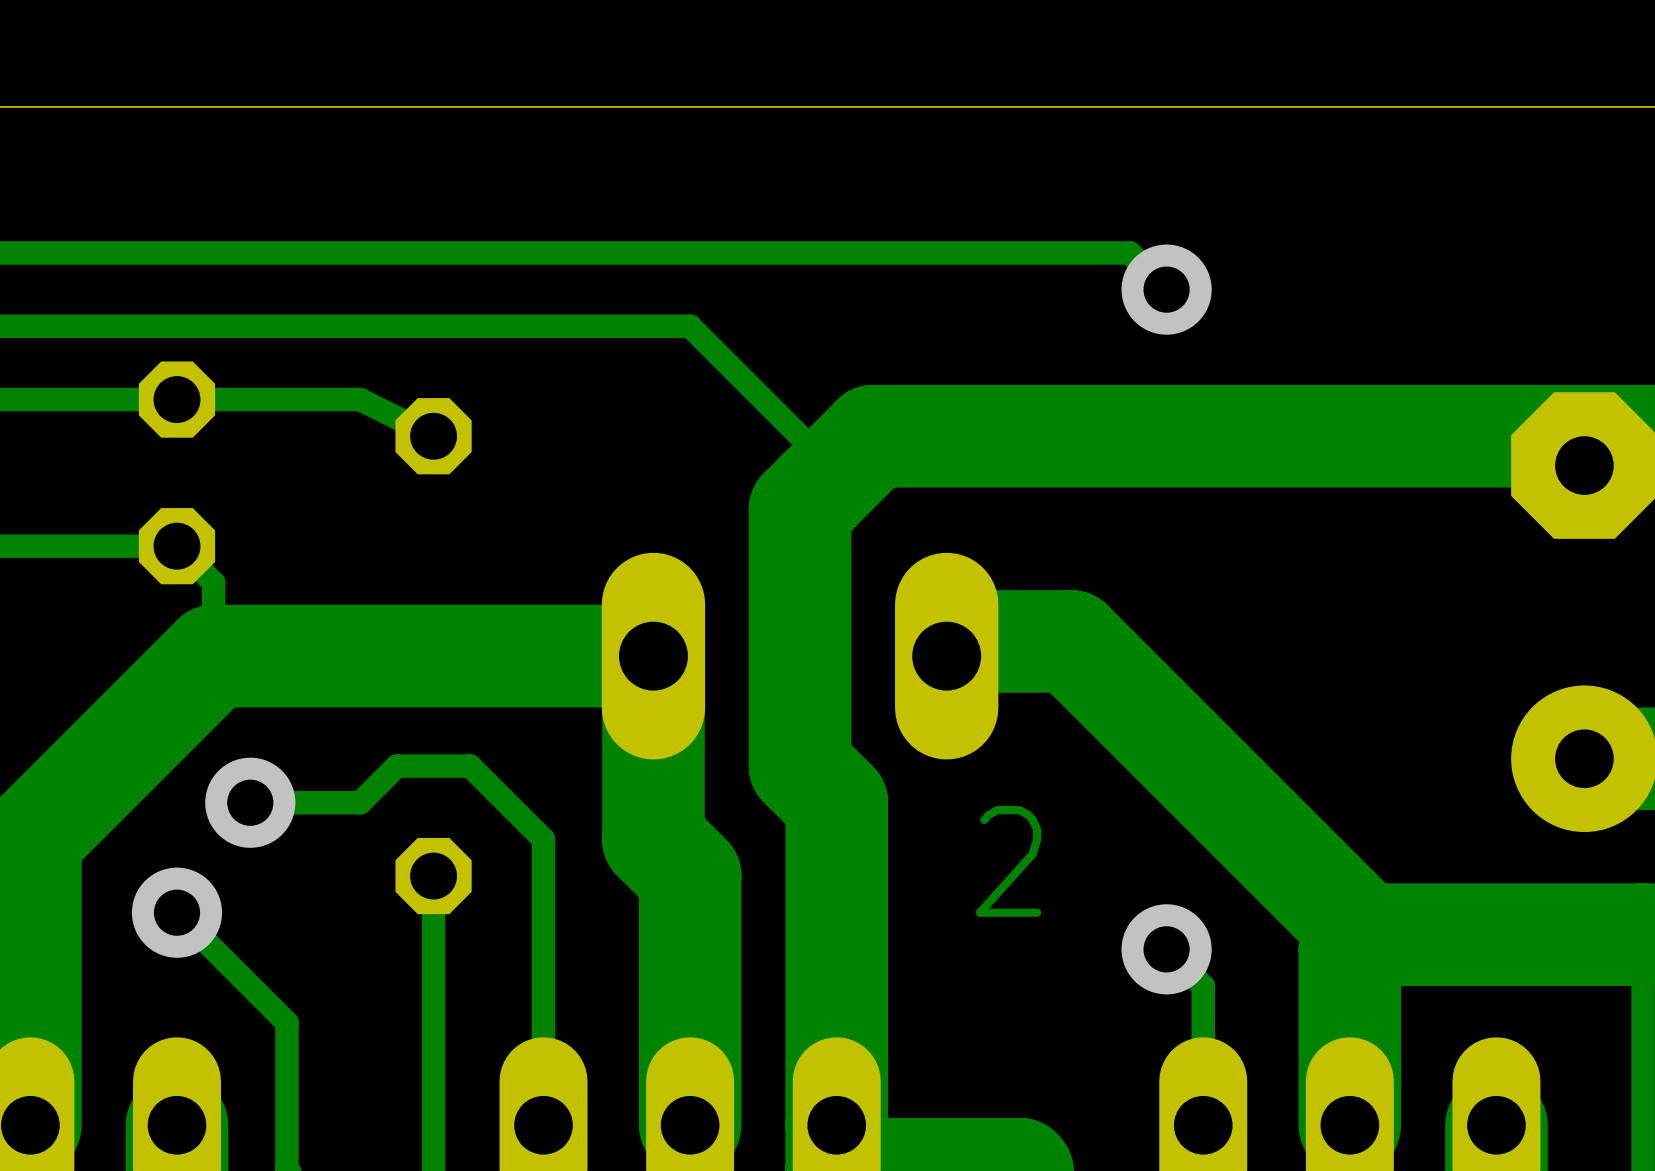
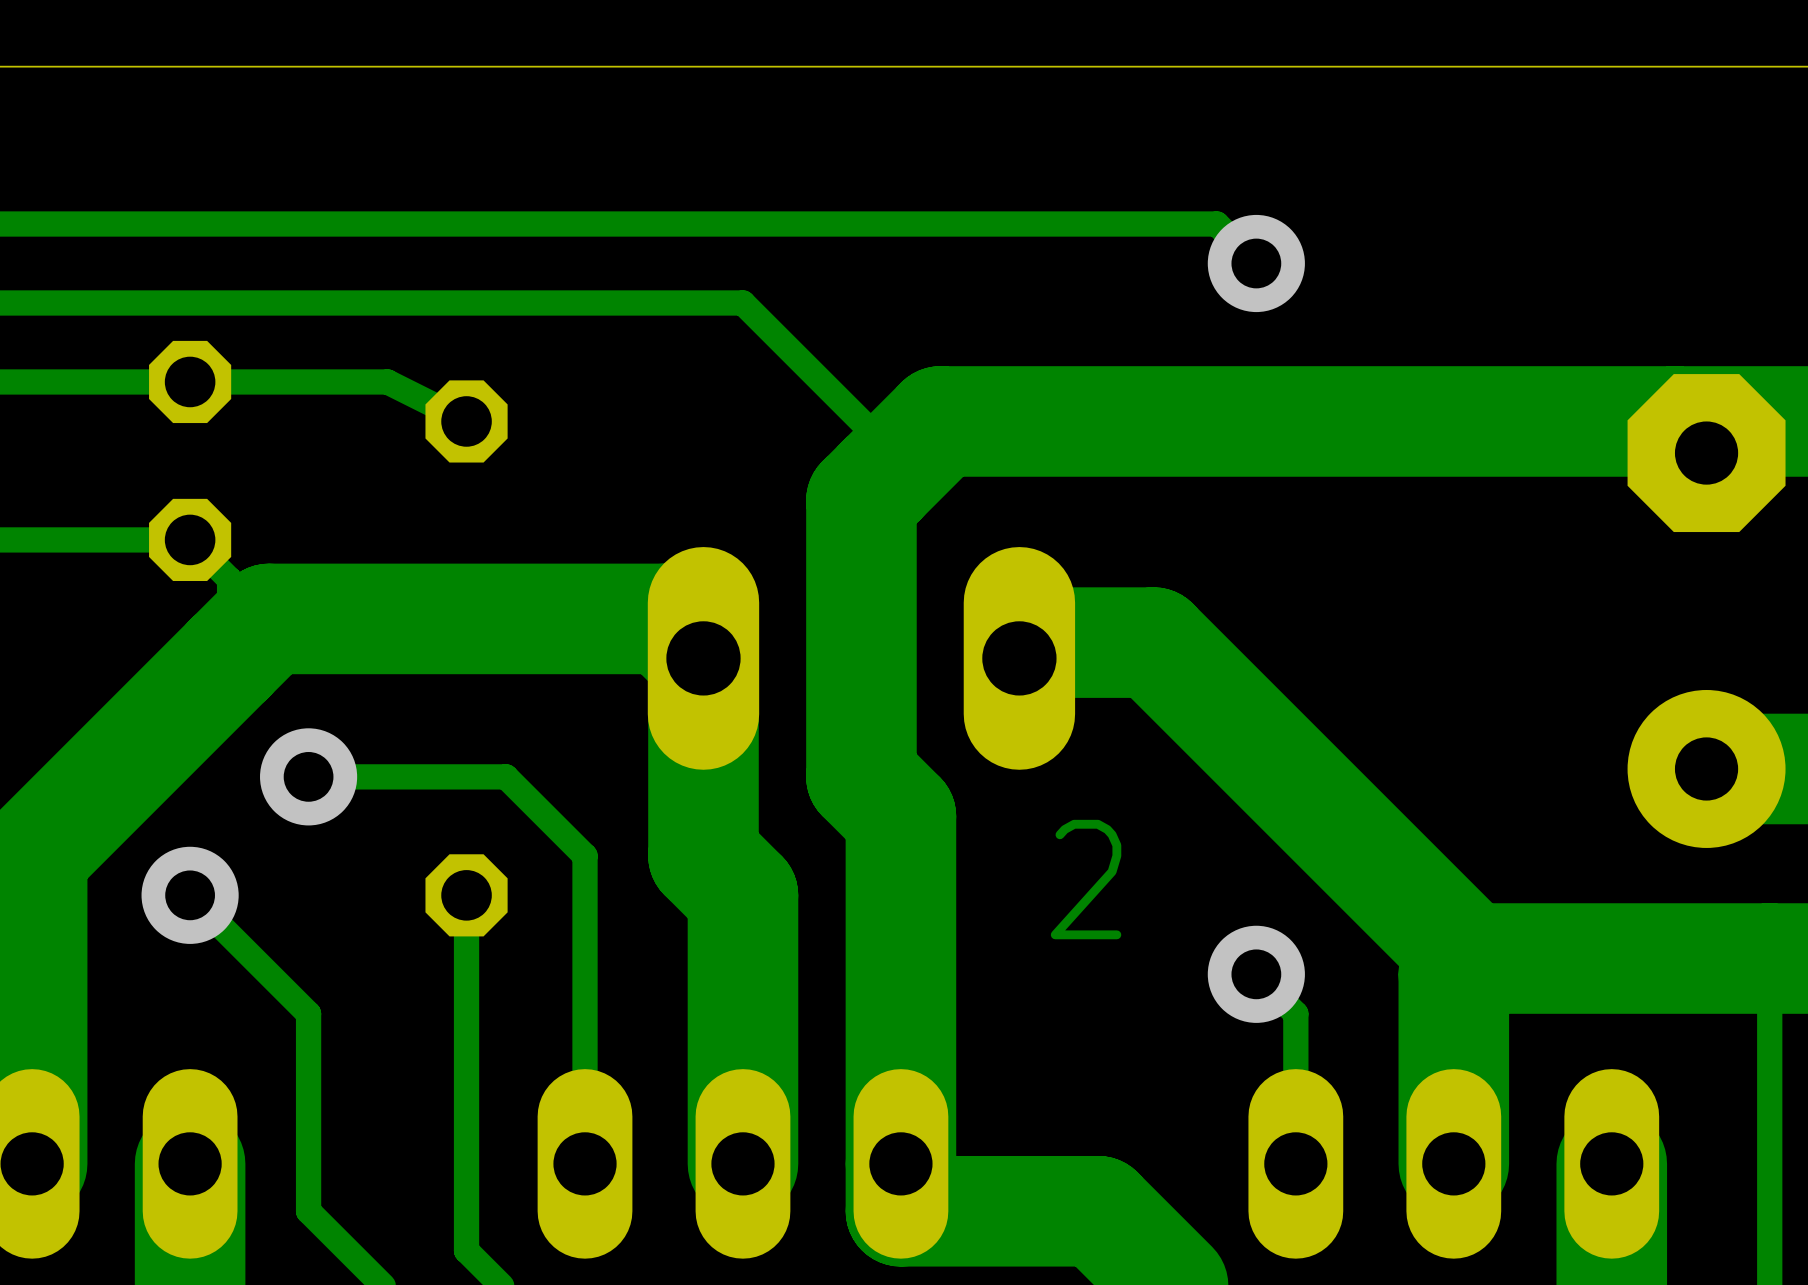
bottom track: (653, 656) (213, 656) -> (703, 658) (663, 618) (269, 618) (229, 658)
bottom track: (396, 766) (360, 802) (250, 802) -> (427, 776) (308, 776)
via position: (250, 802) -> (308, 776)
bottom track: (177, 912) (286, 1022) -> (190, 895) (308, 1013) (308, 1053)
via position: (177, 912) -> (190, 895)

